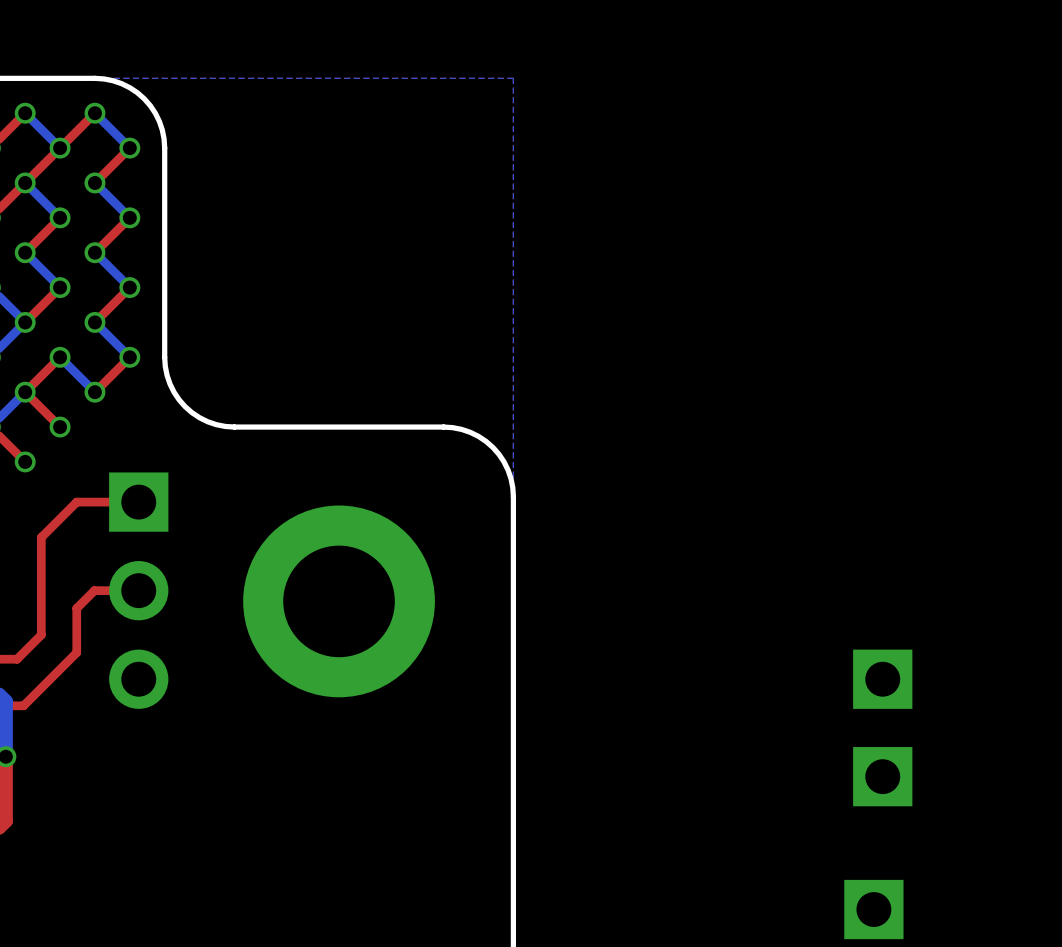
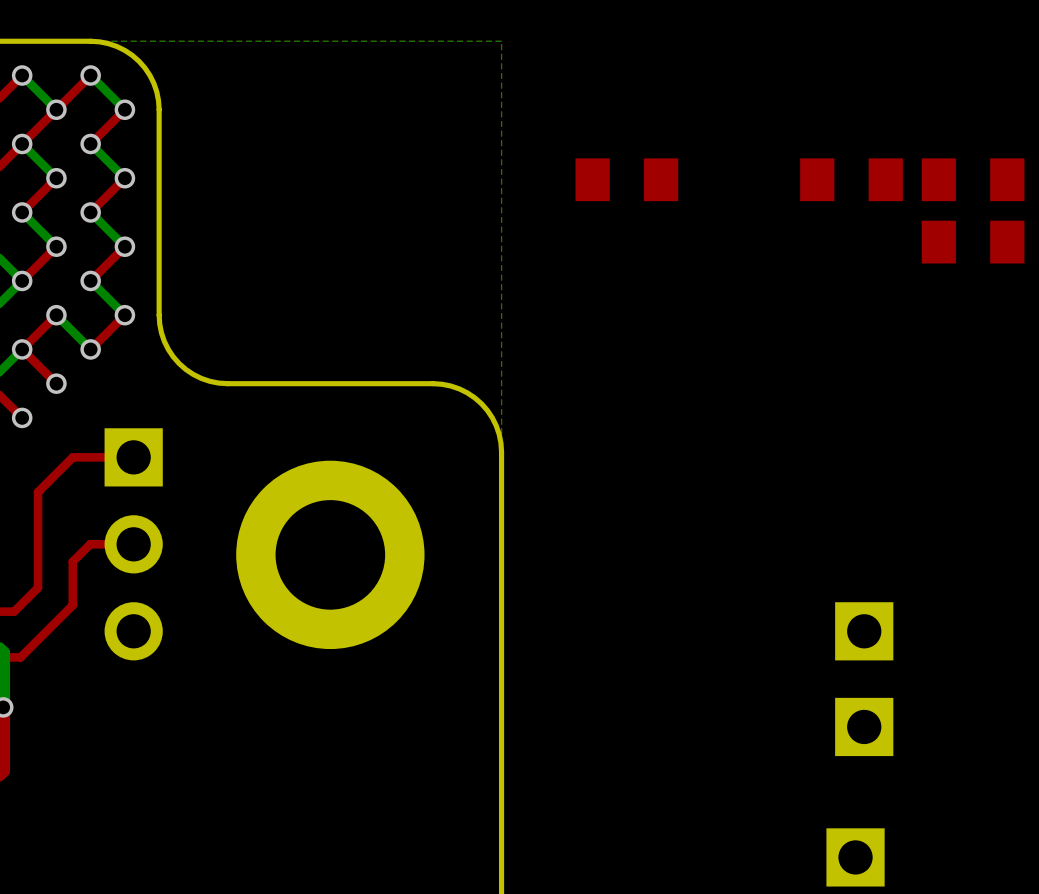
part: none -> (626, 179)
part: none -> (851, 179)
part: none -> (973, 179)
part: none -> (973, 242)

